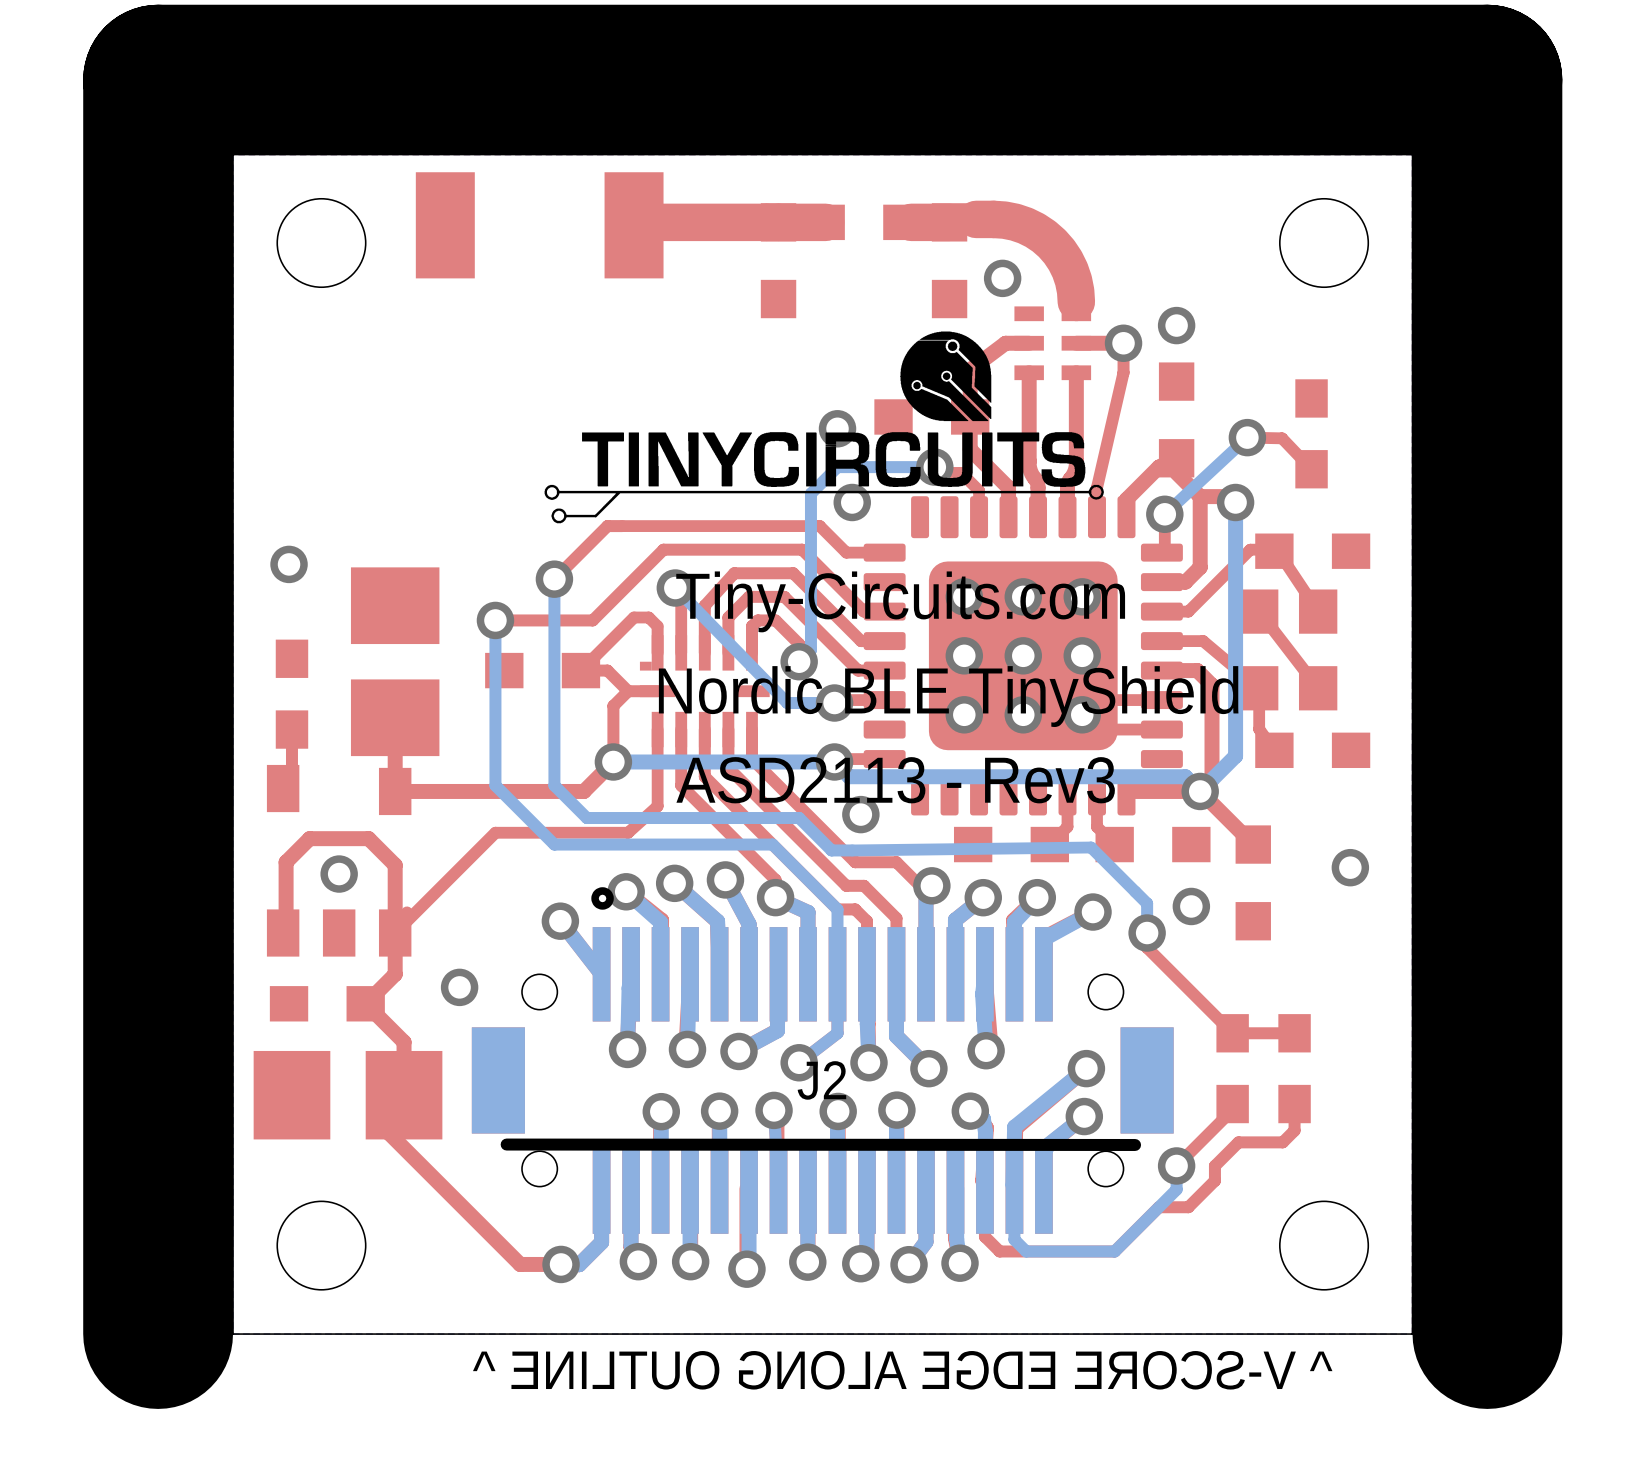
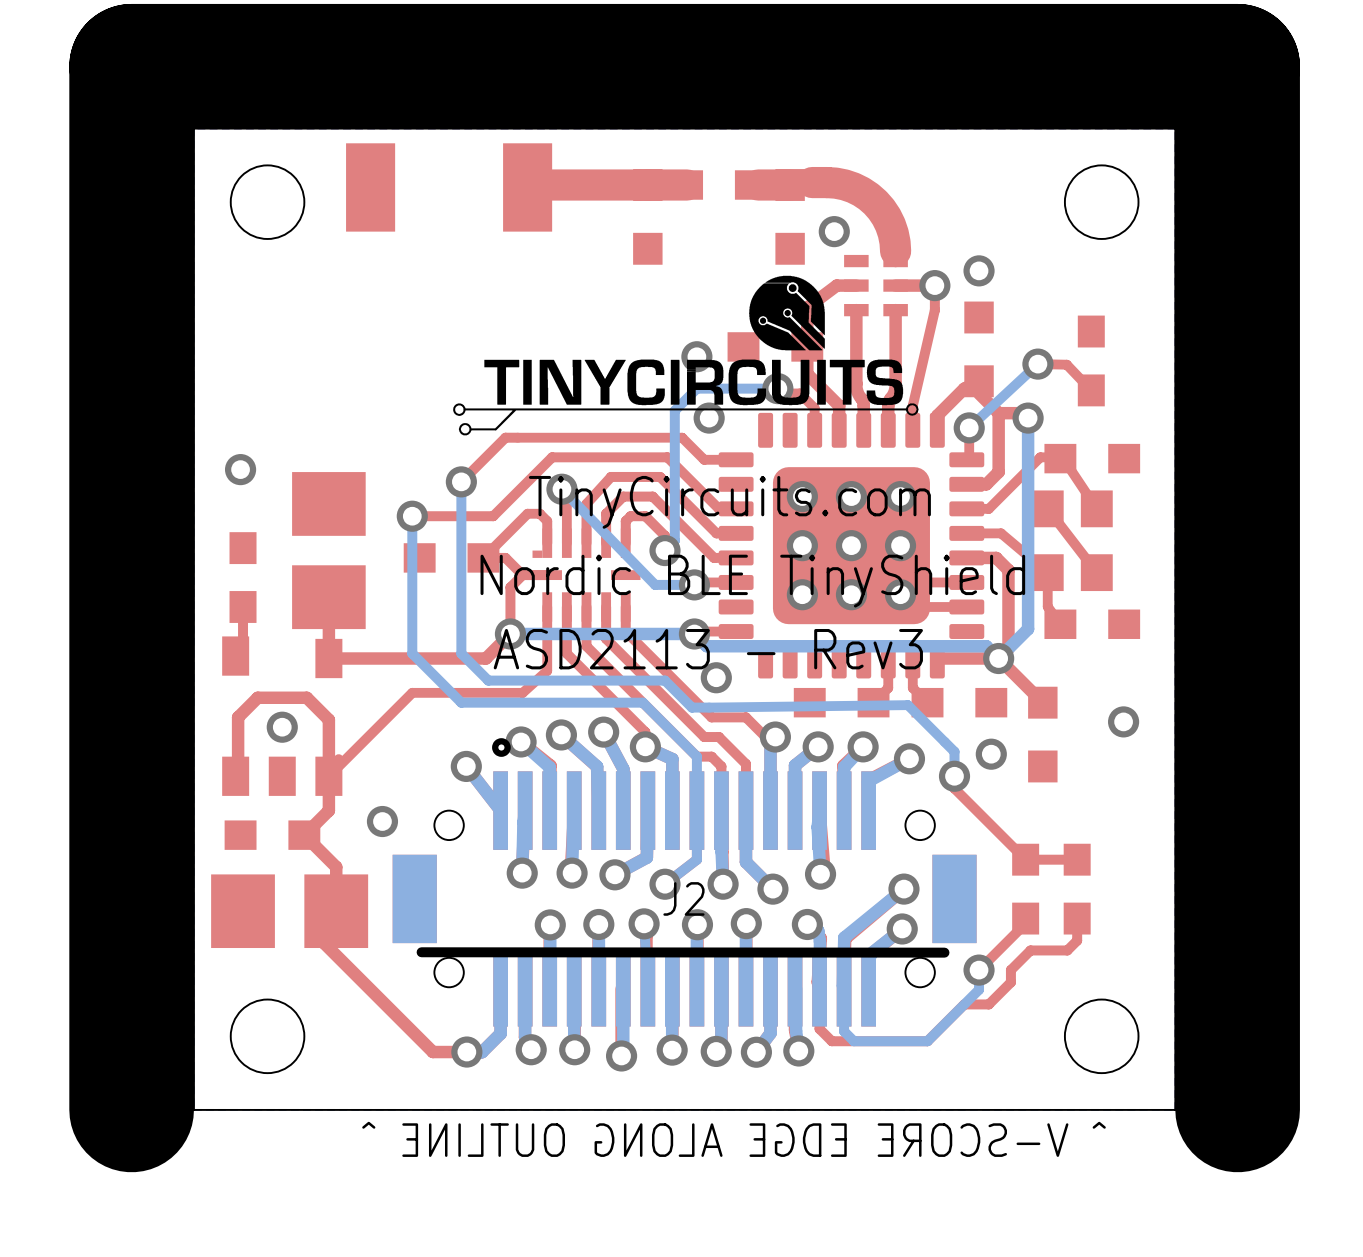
text: Tiny-Circuits.com (900, 601) -> TinyCircuits.com (729, 502)

